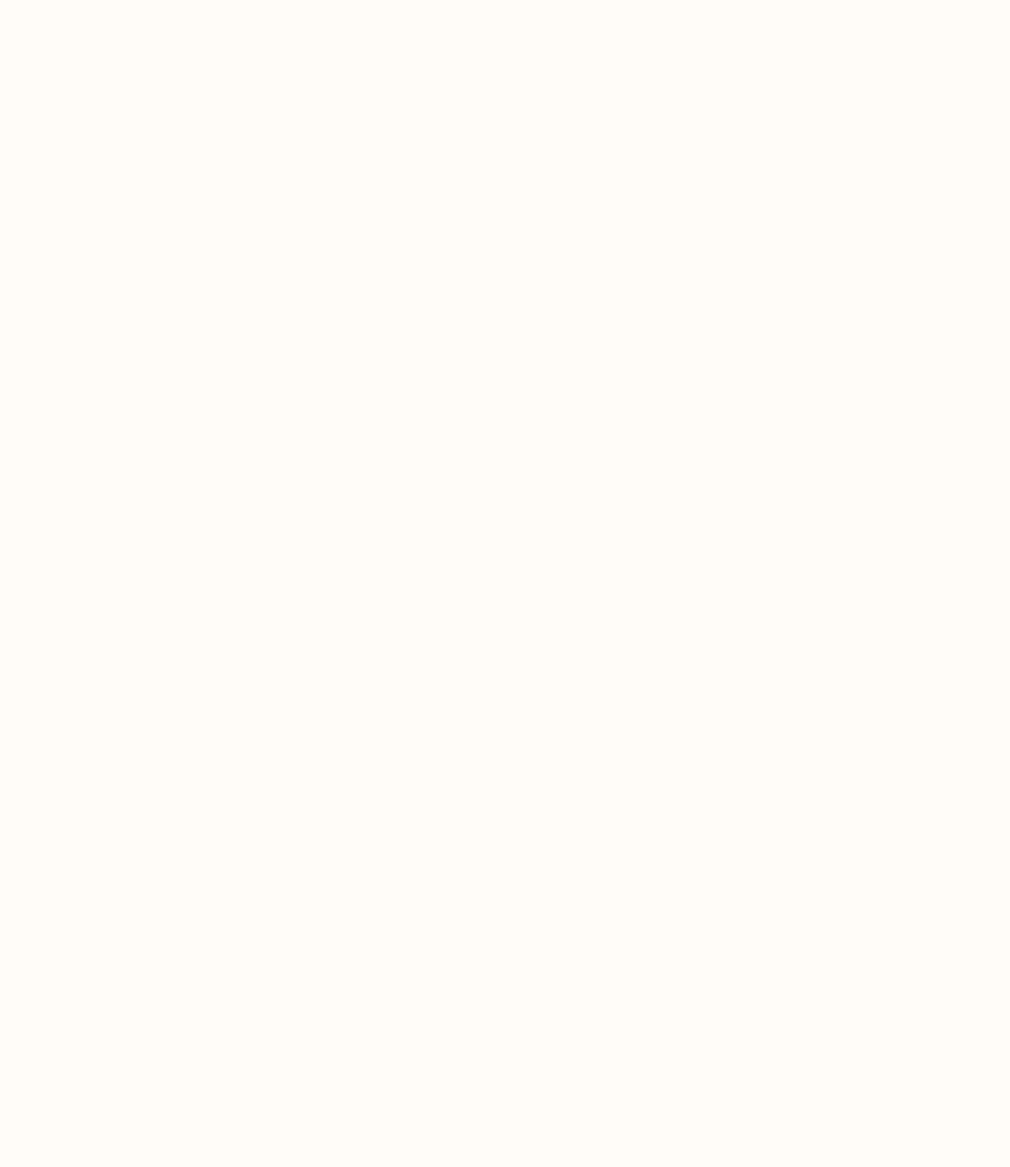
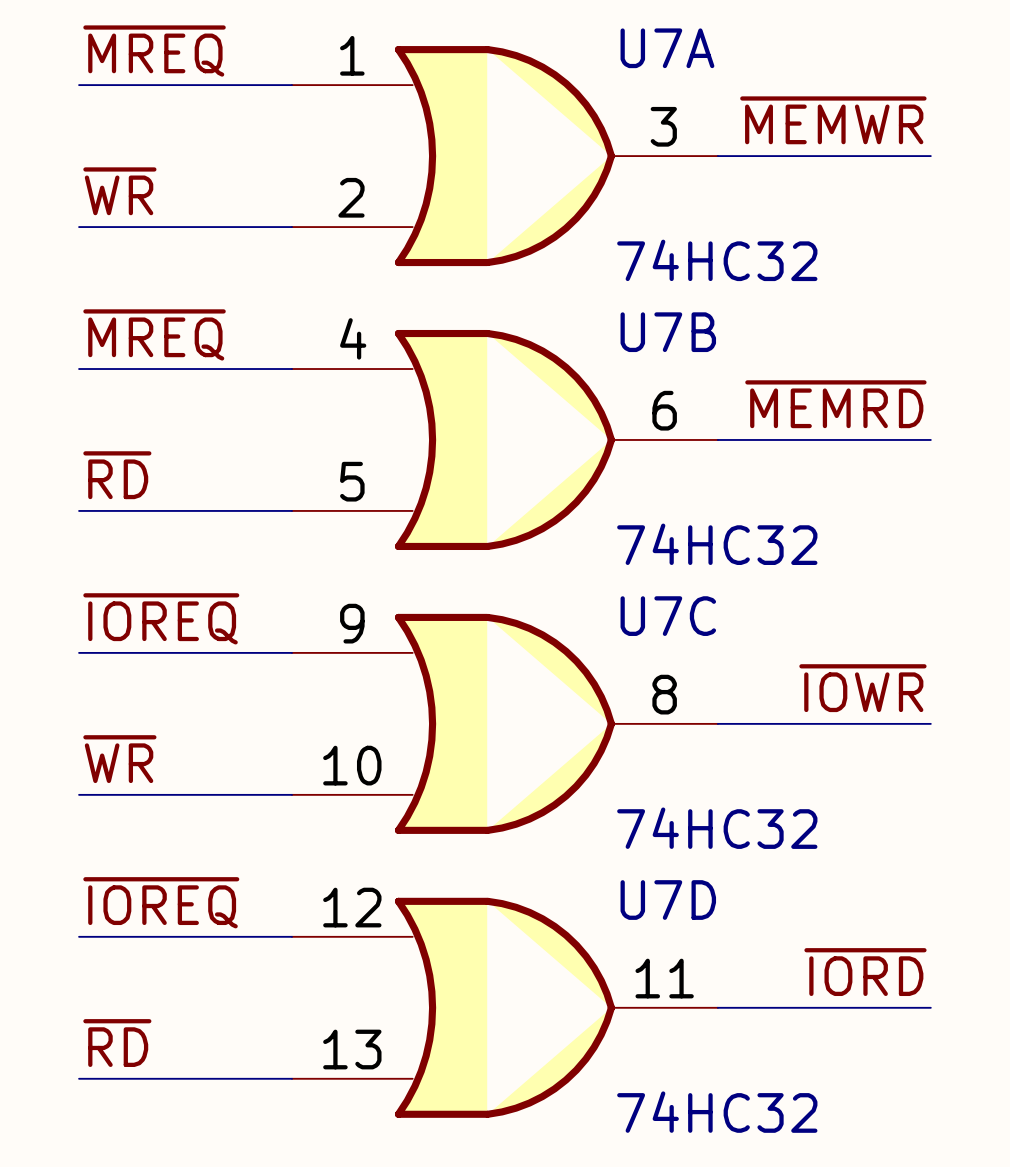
label: none -> ~{MREQ} (154, 51)
wire: none -> (79, 85) (292, 85)
label: none -> ~{MEMWR} (833, 120)
U7A: none -> 74HC32 (504, 156)
wire: none -> (717, 156) (930, 156)
label: none -> ~{WR} (119, 191)
wire: none -> (79, 227) (292, 227)
label: none -> ~{MREQ} (154, 334)
wire: none -> (79, 369) (292, 369)
label: none -> ~{MEMRD} (835, 404)
U7B: none -> 74HC32 (504, 439)
wire: none -> (717, 439) (930, 439)
label: none -> ~{RD} (117, 475)
wire: none -> (79, 510) (292, 510)
label: none -> ~{IOREQ} (161, 618)
wire: none -> (79, 652) (292, 652)
label: none -> ~{IOWR} (862, 688)
U7C: none -> 74HC32 (504, 723)
wire: none -> (717, 723) (930, 723)
label: none -> ~{WR} (119, 759)
wire: none -> (79, 794) (292, 794)
label: none -> ~{IOREQ} (161, 902)
wire: none -> (79, 936) (292, 936)
label: none -> ~{IORD} (865, 972)
U7D: none -> 74HC32 (504, 1007)
wire: none -> (717, 1007) (930, 1007)
label: none -> ~{RD} (117, 1043)
wire: none -> (79, 1078) (292, 1078)

